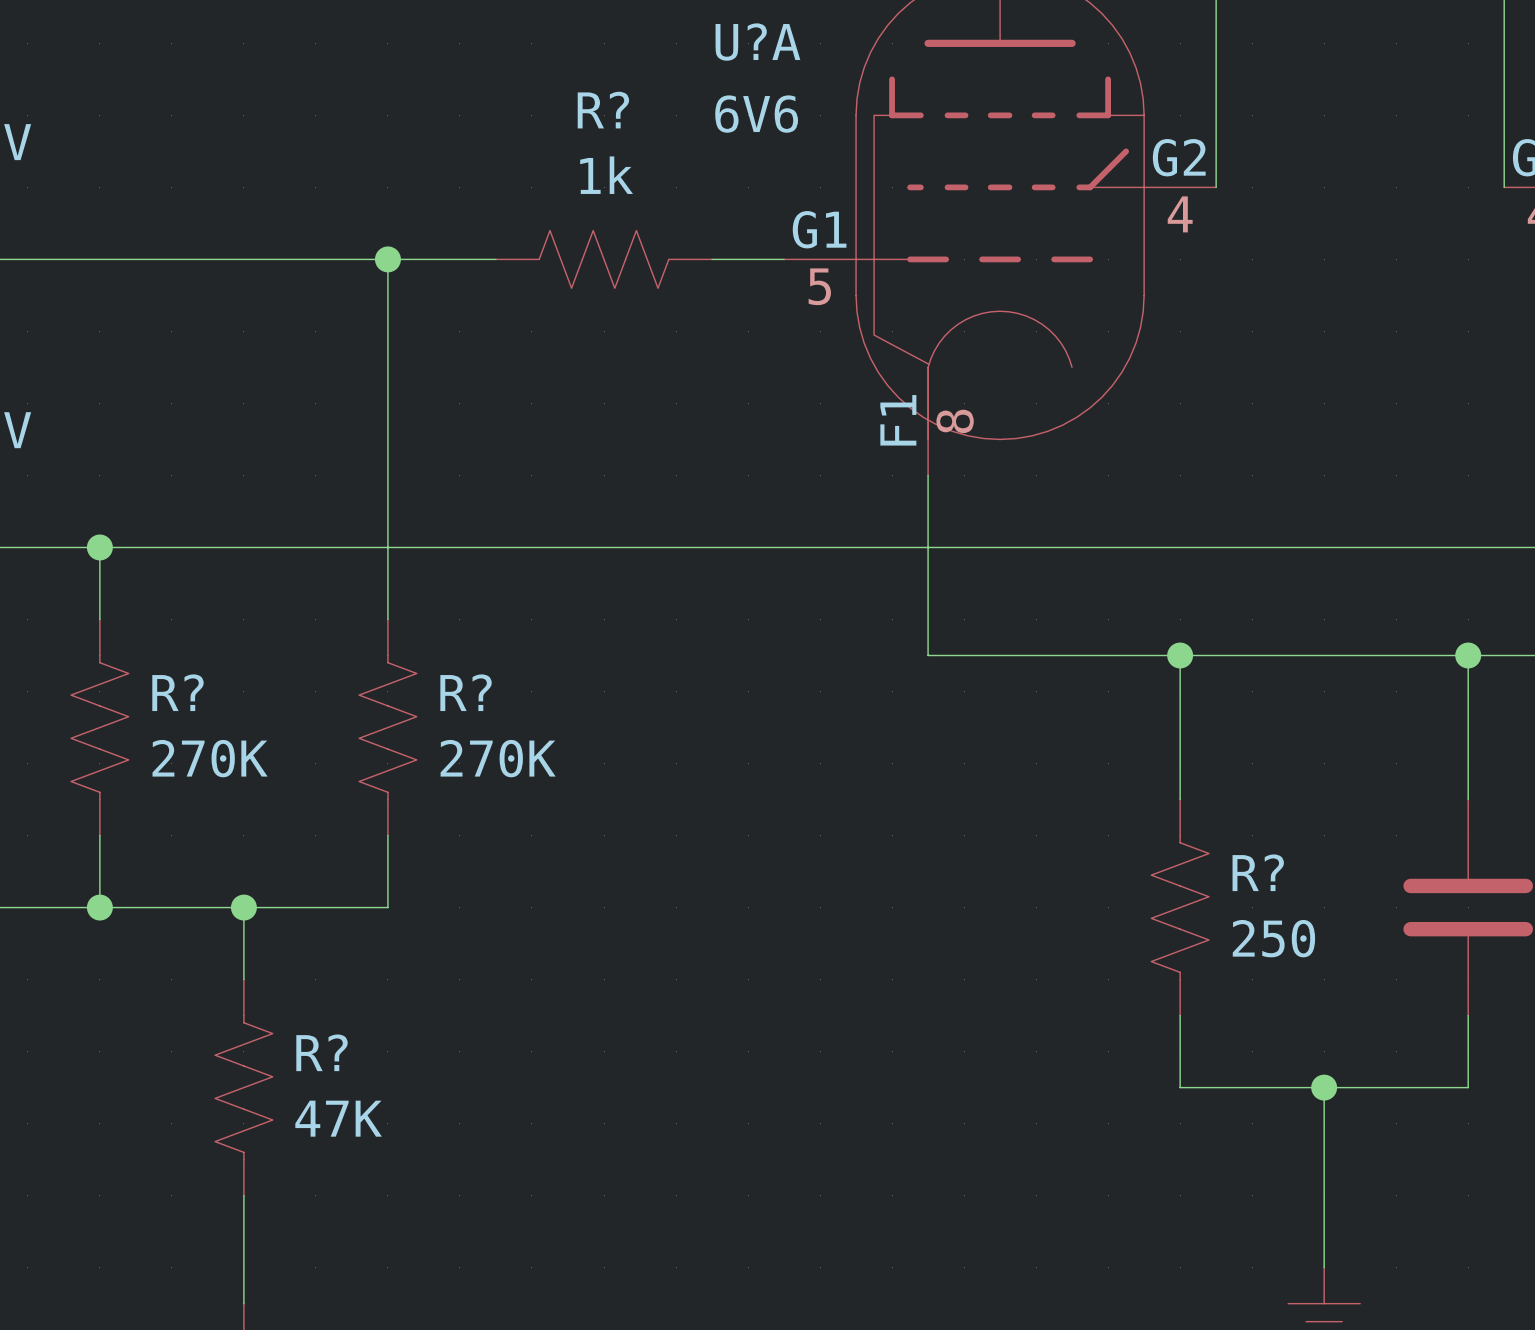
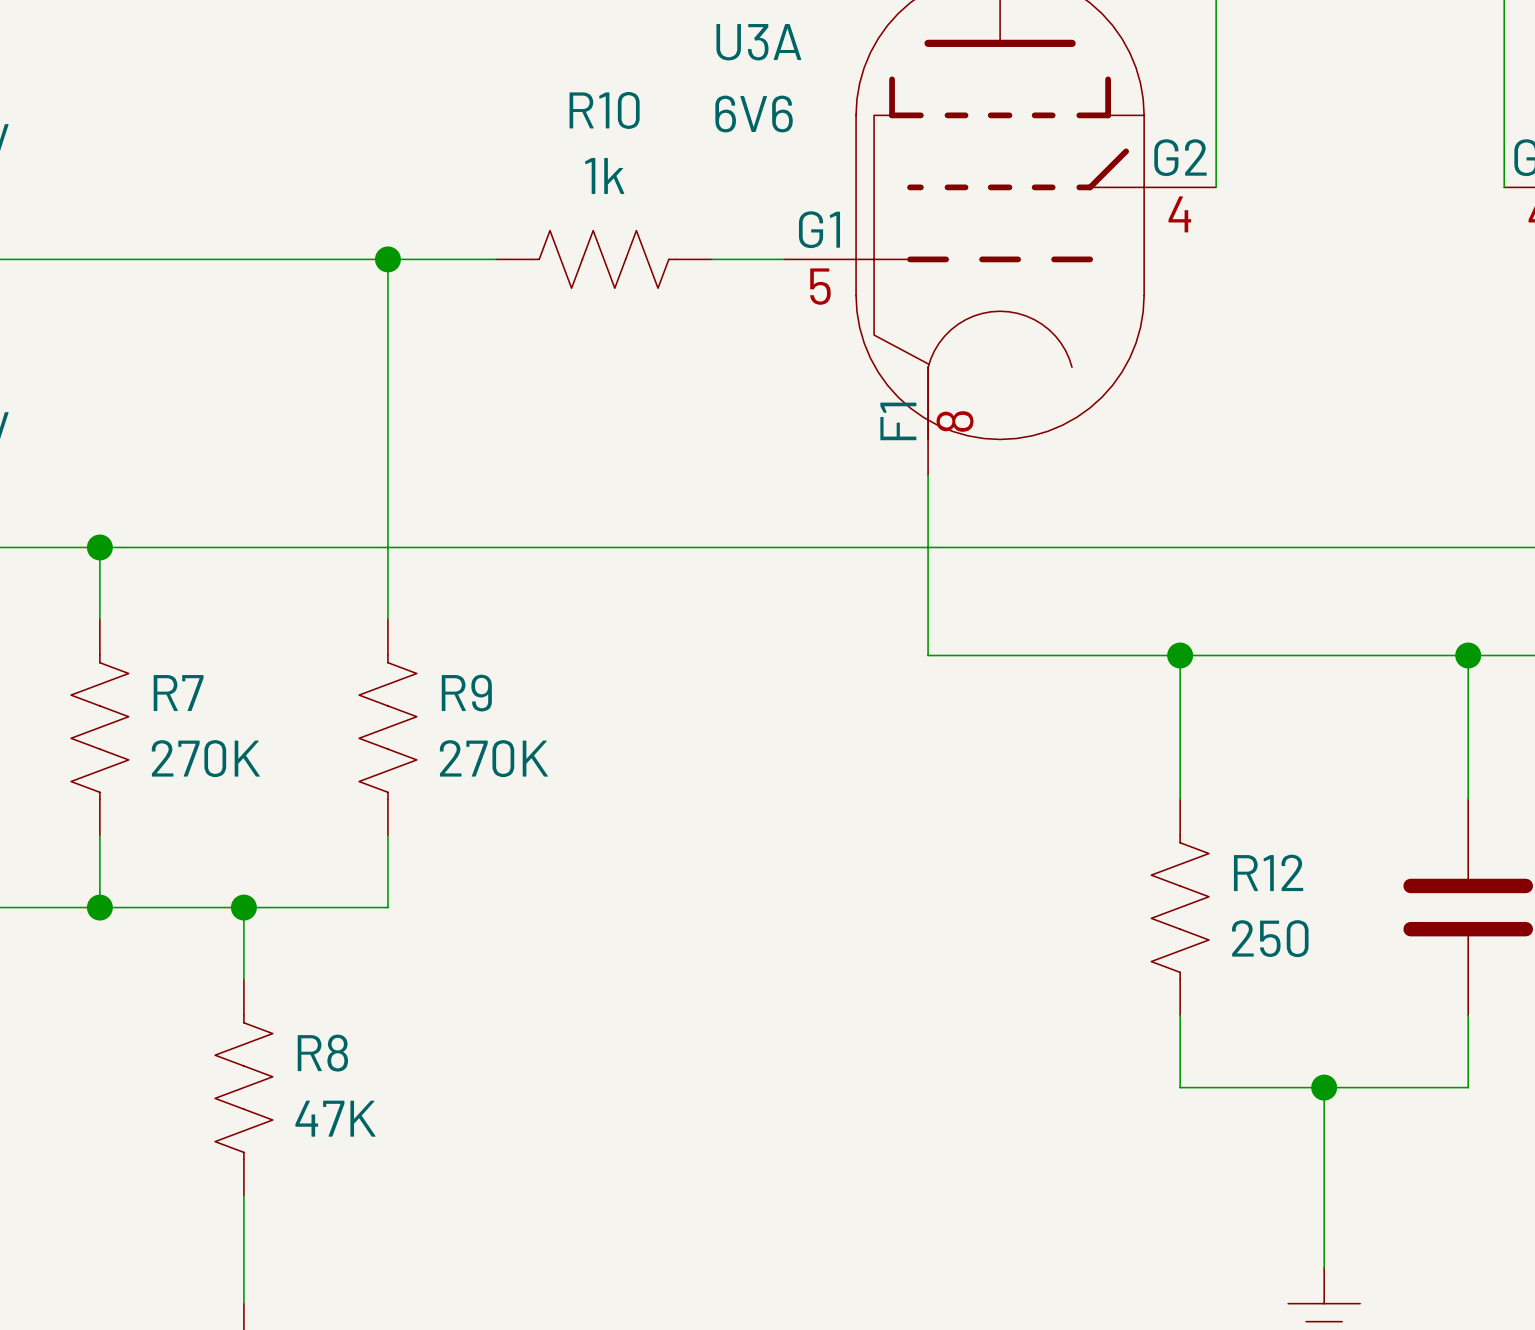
U?A name: U?A (757, 42) -> U3A (758, 42)
R? name: R? (603, 110) -> R10 (604, 110)
R? name: R? (177, 692) -> R7 (178, 693)
R? name: R? (466, 692) -> R9 (466, 693)
R? name: R? (1258, 872) -> R12 (1268, 872)
R? name: R? (322, 1052) -> R8 (322, 1053)

